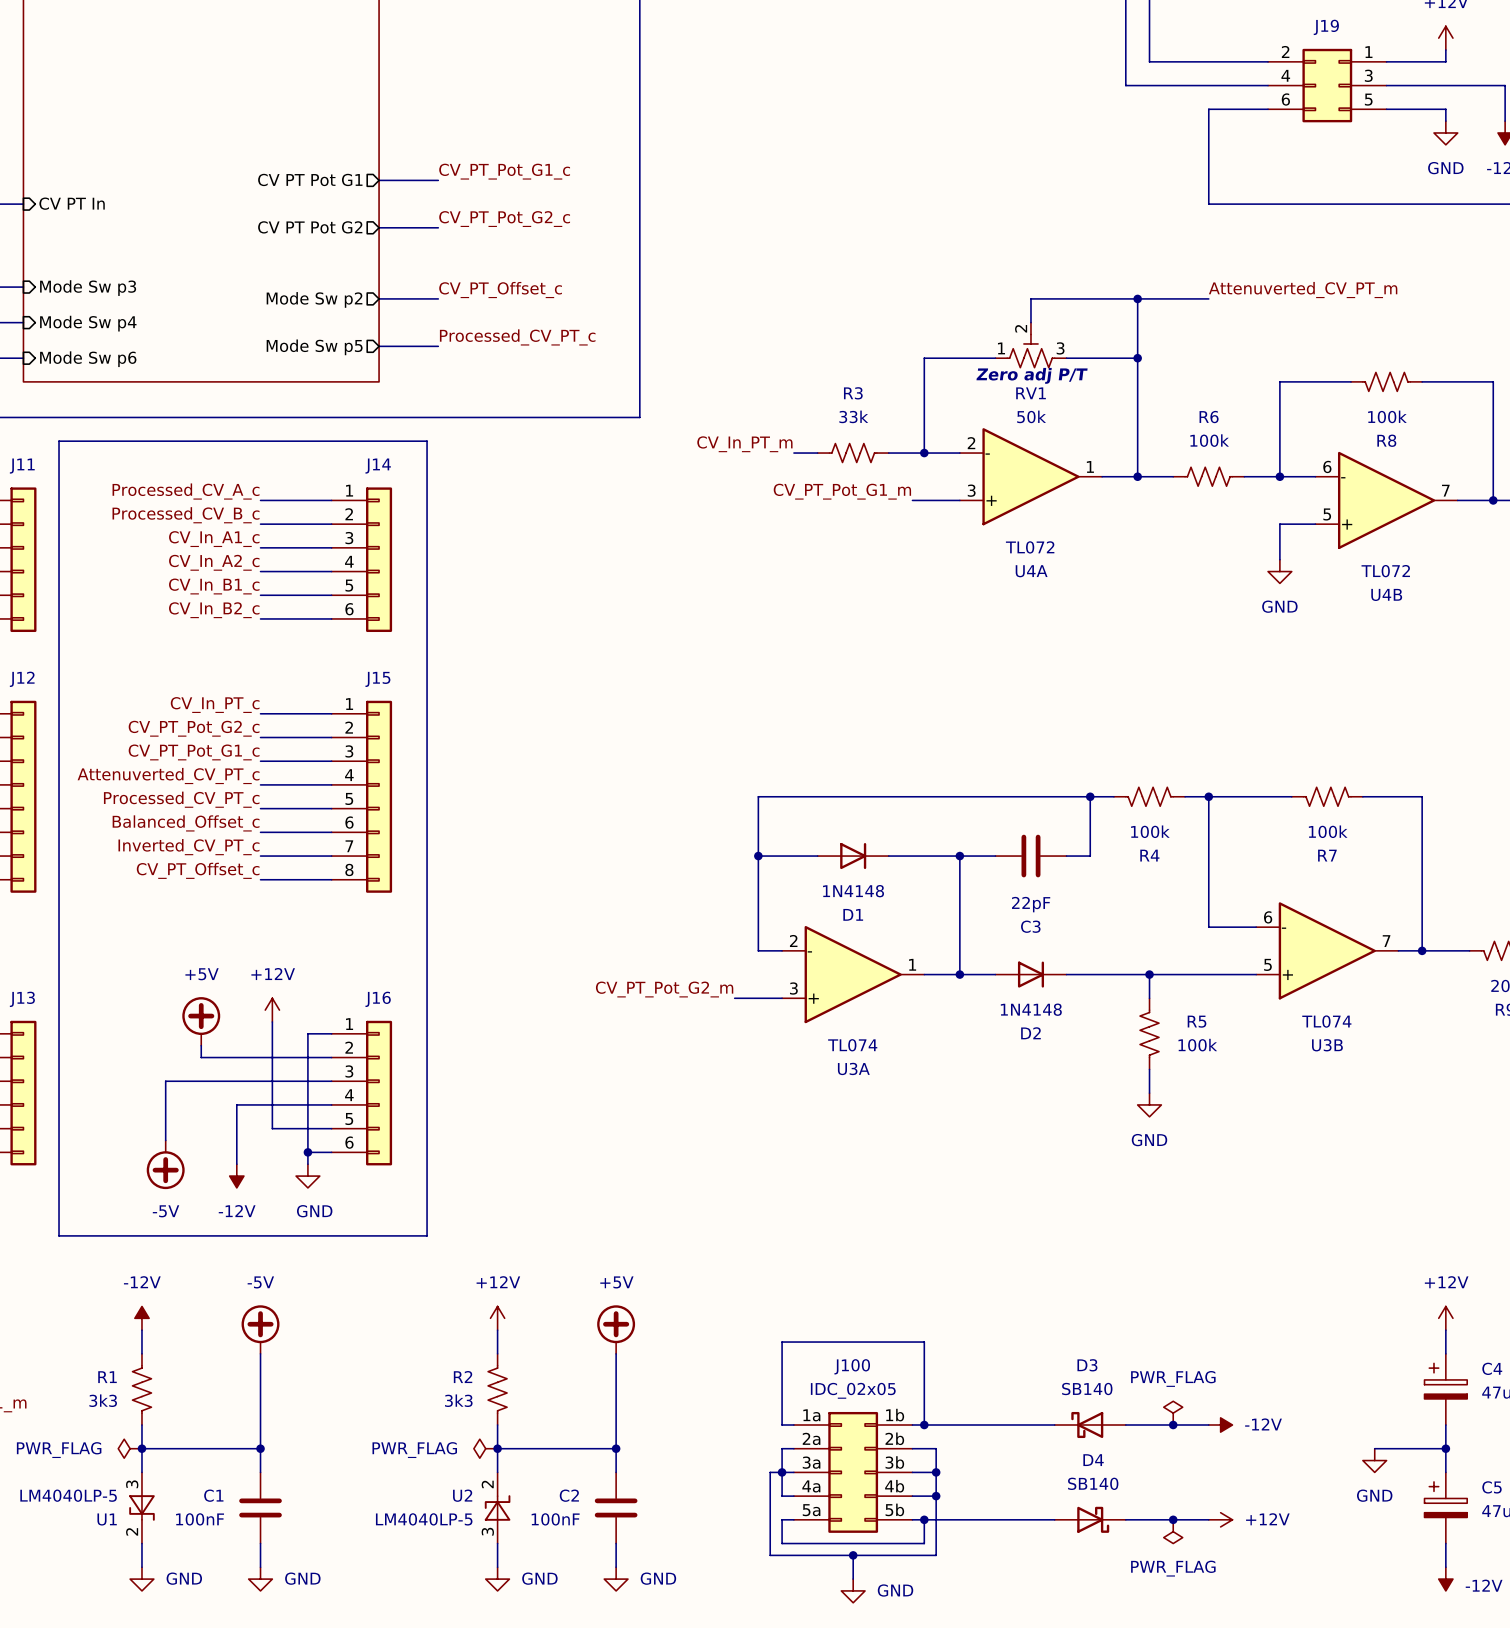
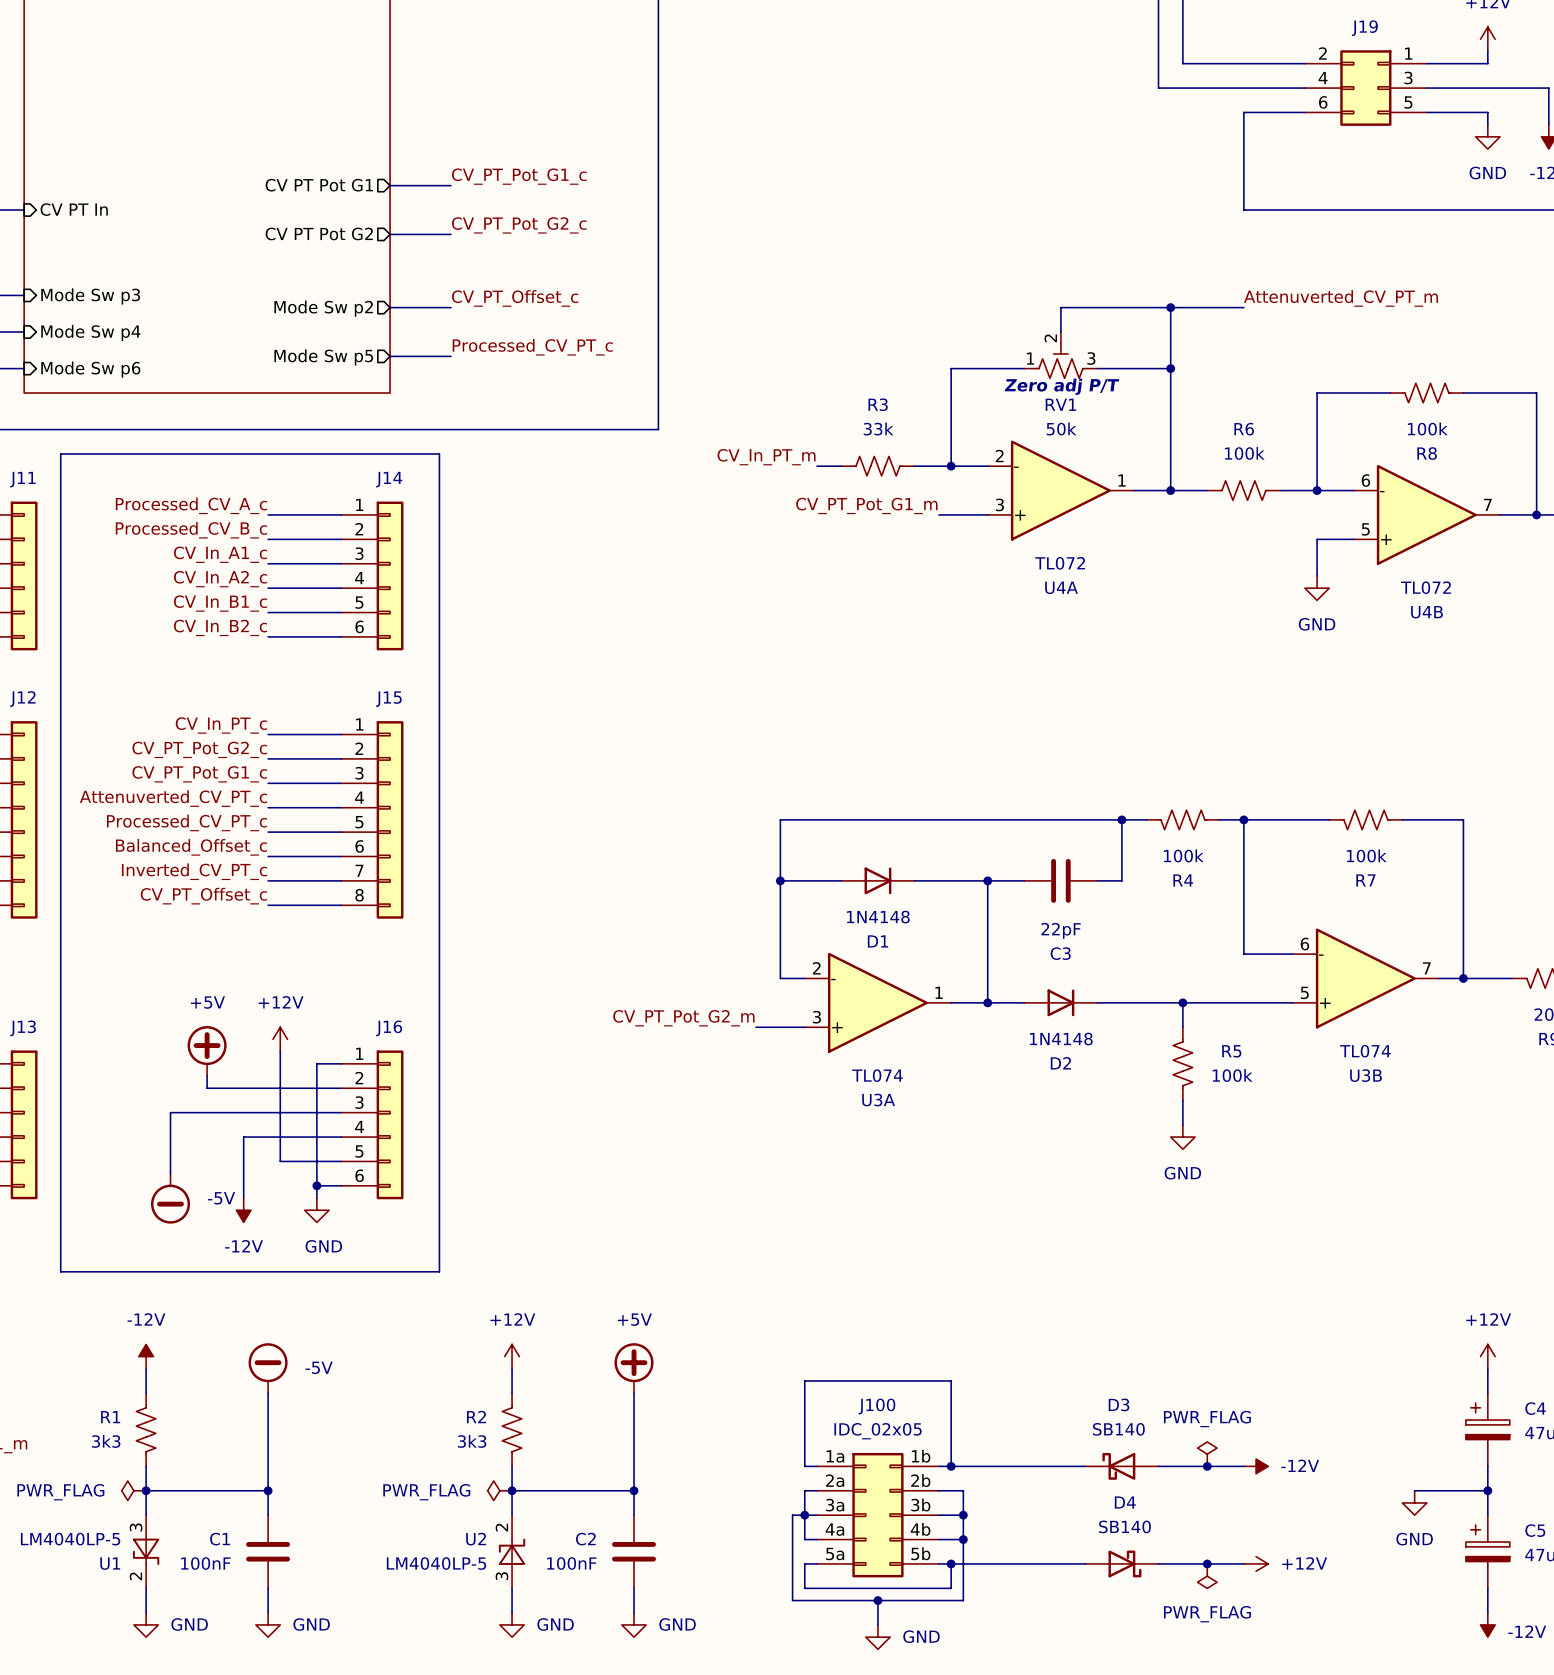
power symbol shape: [146, 1140, 185, 1190] -> [150, 1173, 191, 1224]
power symbol text position: -5V (166, 1211) -> -5V (221, 1198)
power symbol text position: -5V (260, 1282) -> -5V (319, 1367)
power symbol shape: [241, 1305, 280, 1354] -> [248, 1343, 288, 1394]

